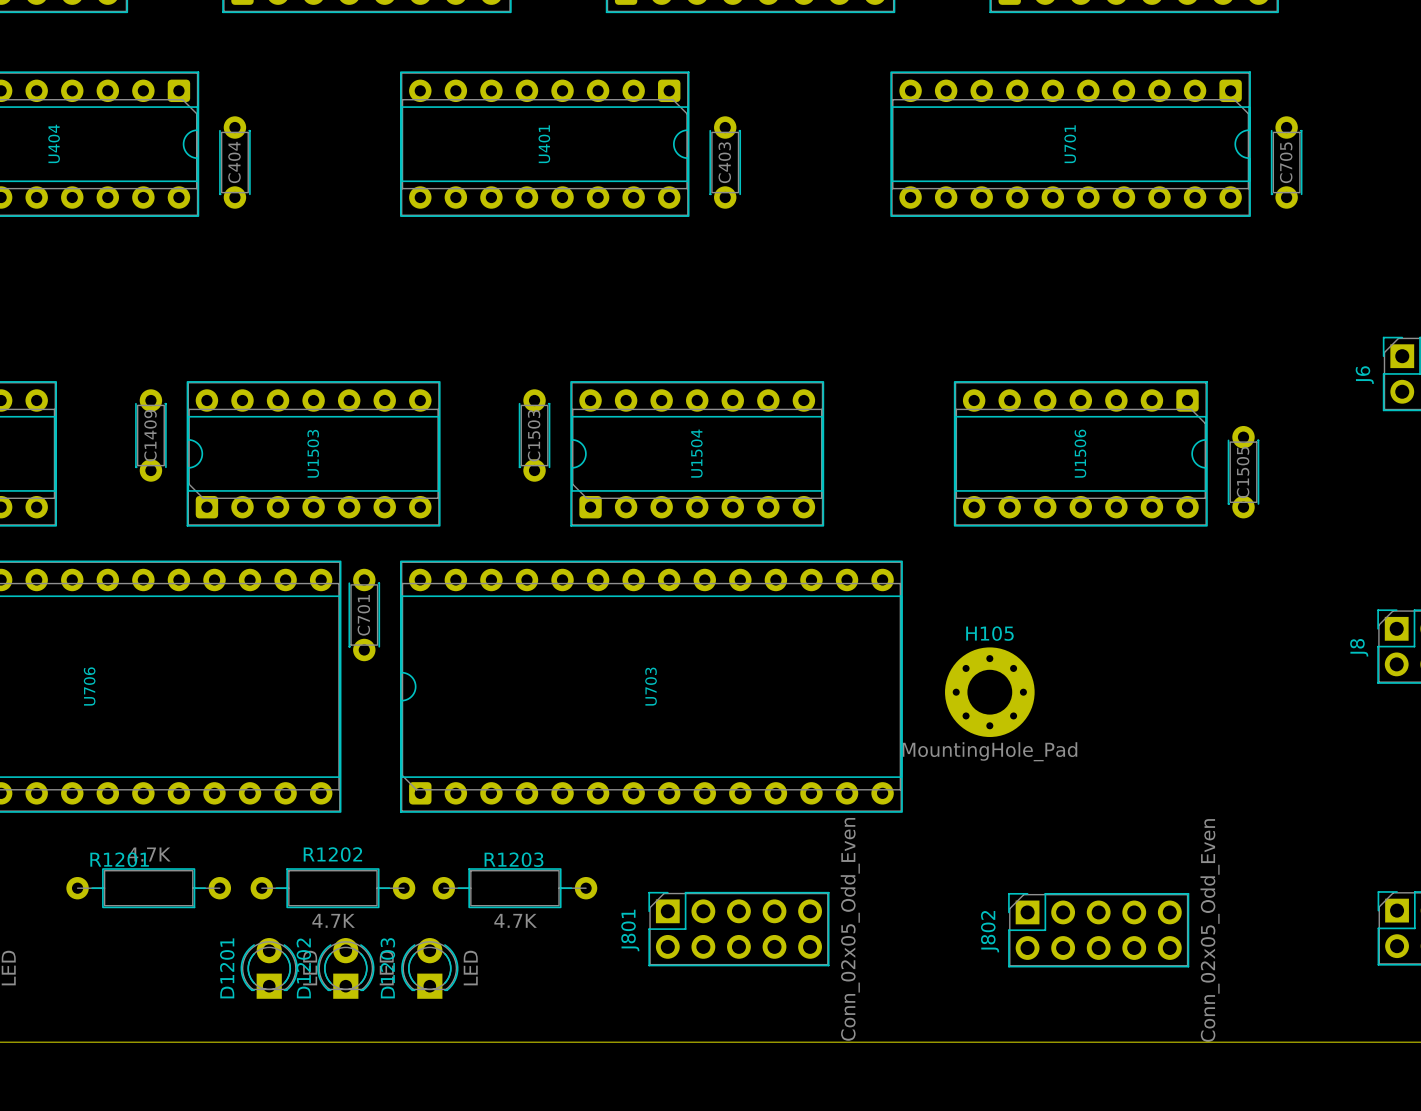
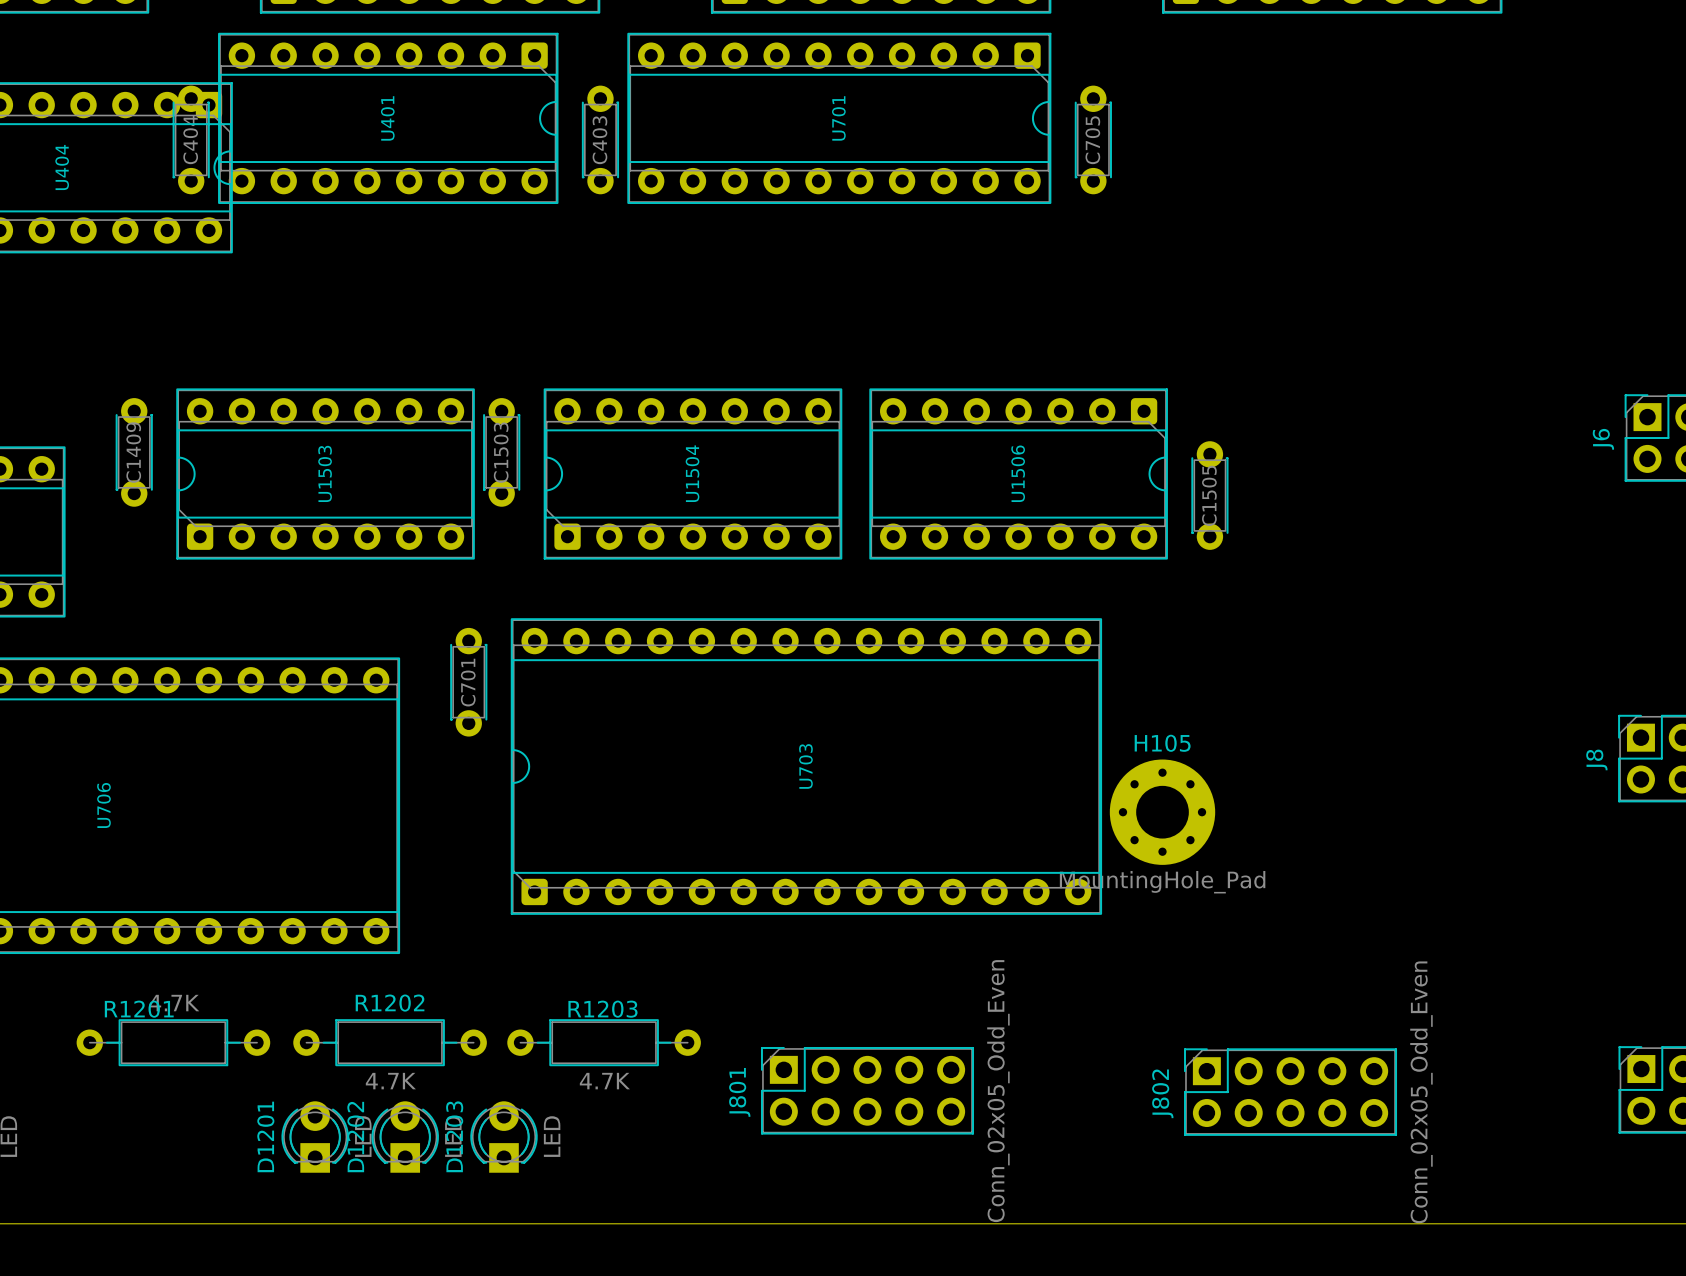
U401 position: (544, 144) -> (388, 118)
U701 position: (1070, 144) -> (839, 118)
C404 position: (234, 162) -> (191, 139)
C403 position: (725, 162) -> (600, 139)
C705 position: (1286, 162) -> (1093, 139)
C1409 position: (150, 435) -> (134, 452)
C1503 position: (534, 435) -> (501, 452)
U1503 position: (313, 453) -> (325, 473)
U1504 position: (697, 453) -> (692, 473)
U1506 position: (1080, 453) -> (1018, 473)
C1505 position: (1243, 472) -> (1209, 495)
C701 position: (364, 614) -> (468, 682)
U703 position: (651, 686) -> (806, 766)

